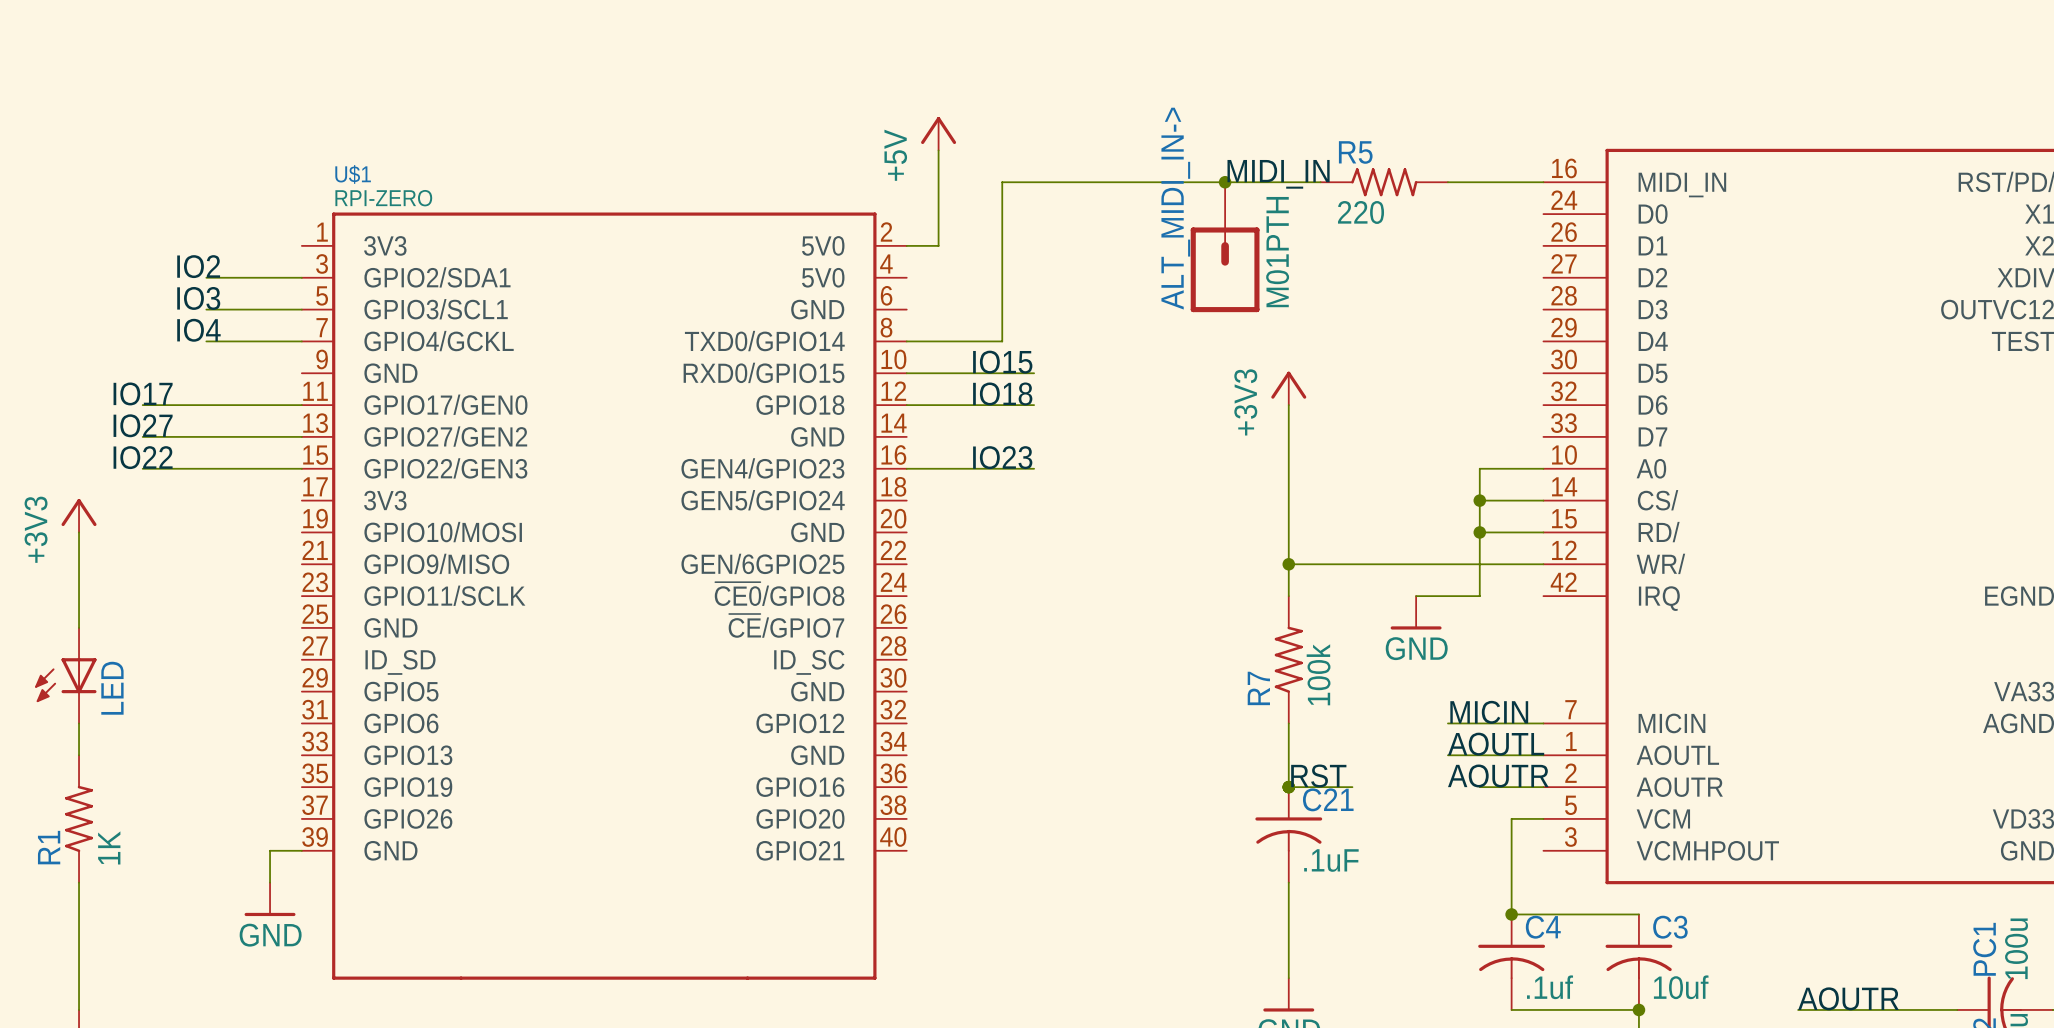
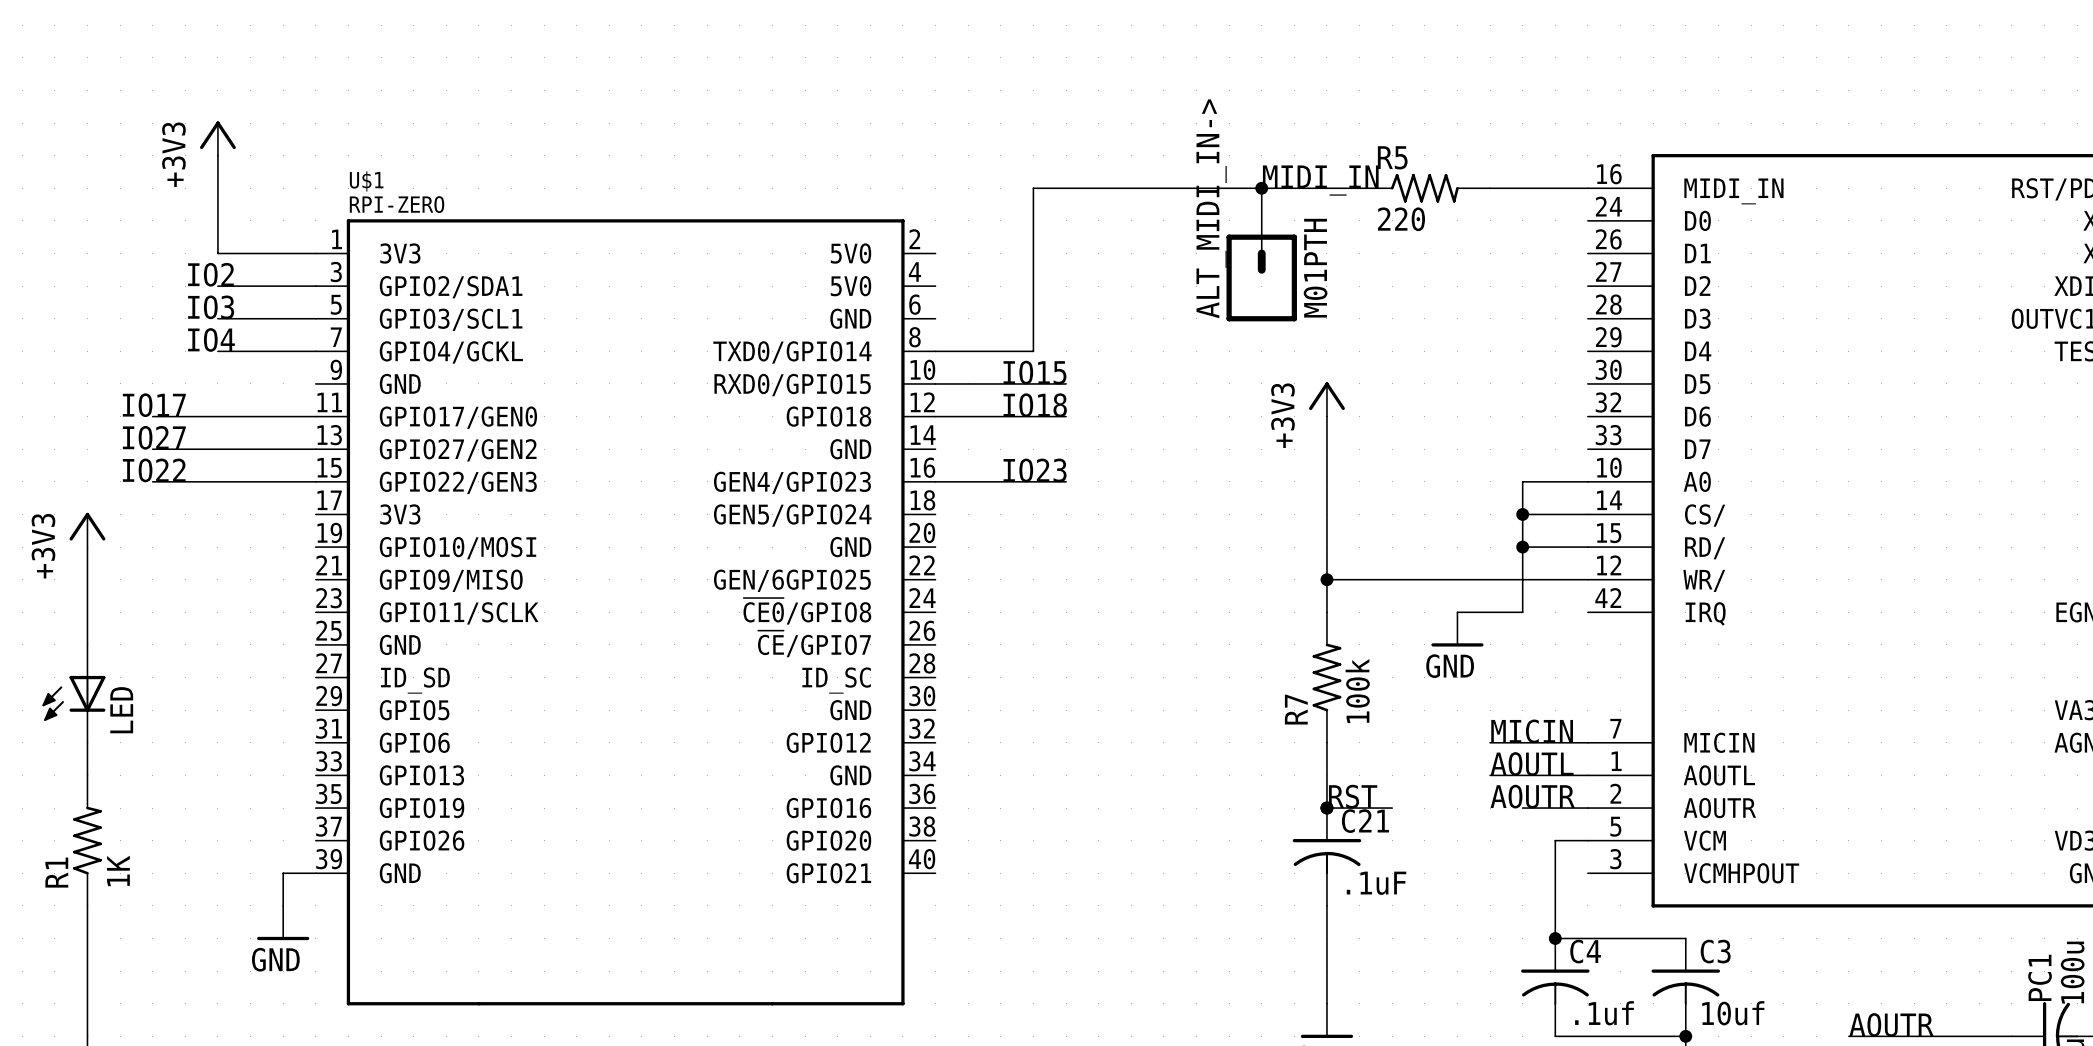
power symbol: none -> +3V3 (217, 138)
power symbol: +5V (938, 133) -> none
wire: none -> (217, 155) (217, 253) (315, 253)
wire: (938, 150) (938, 245) (906, 245) -> none

